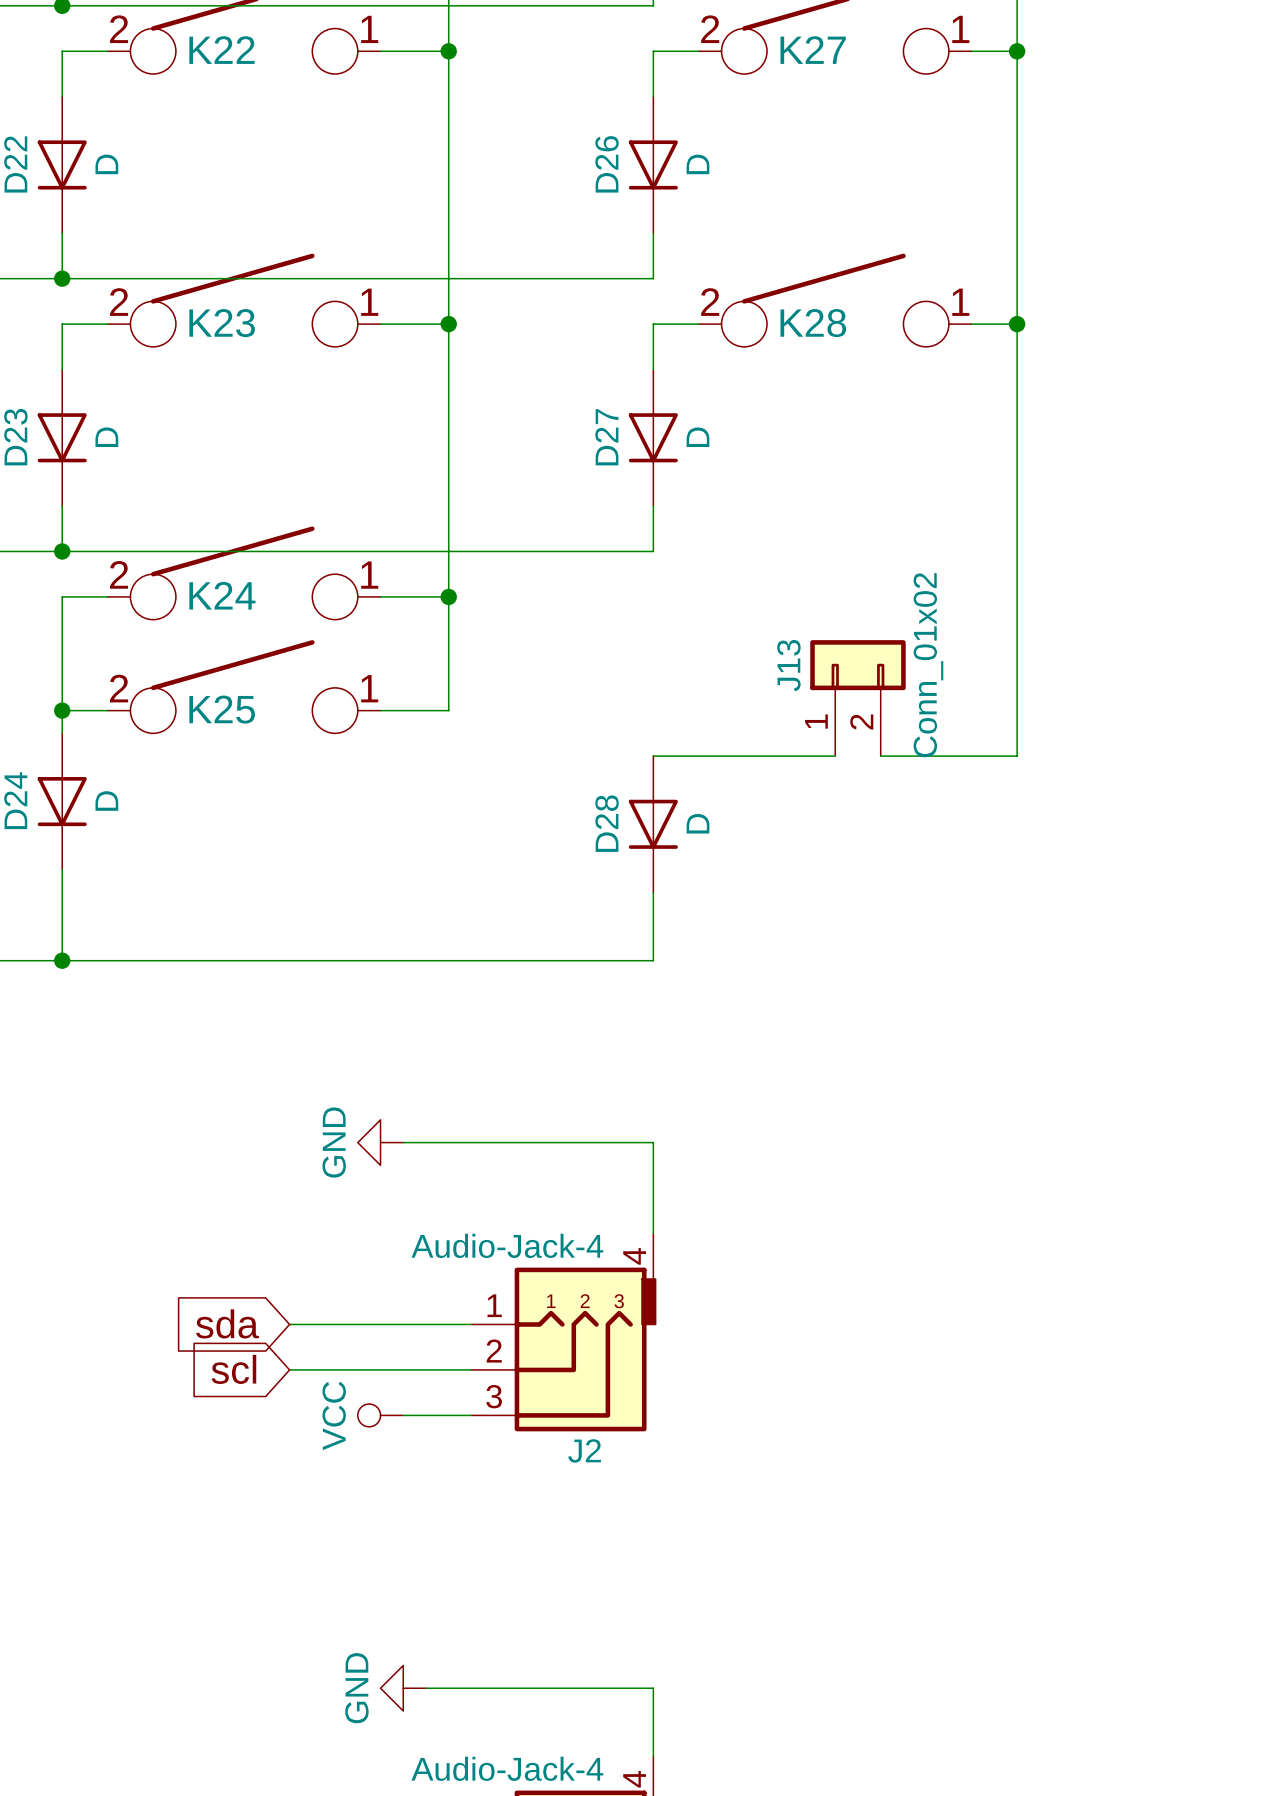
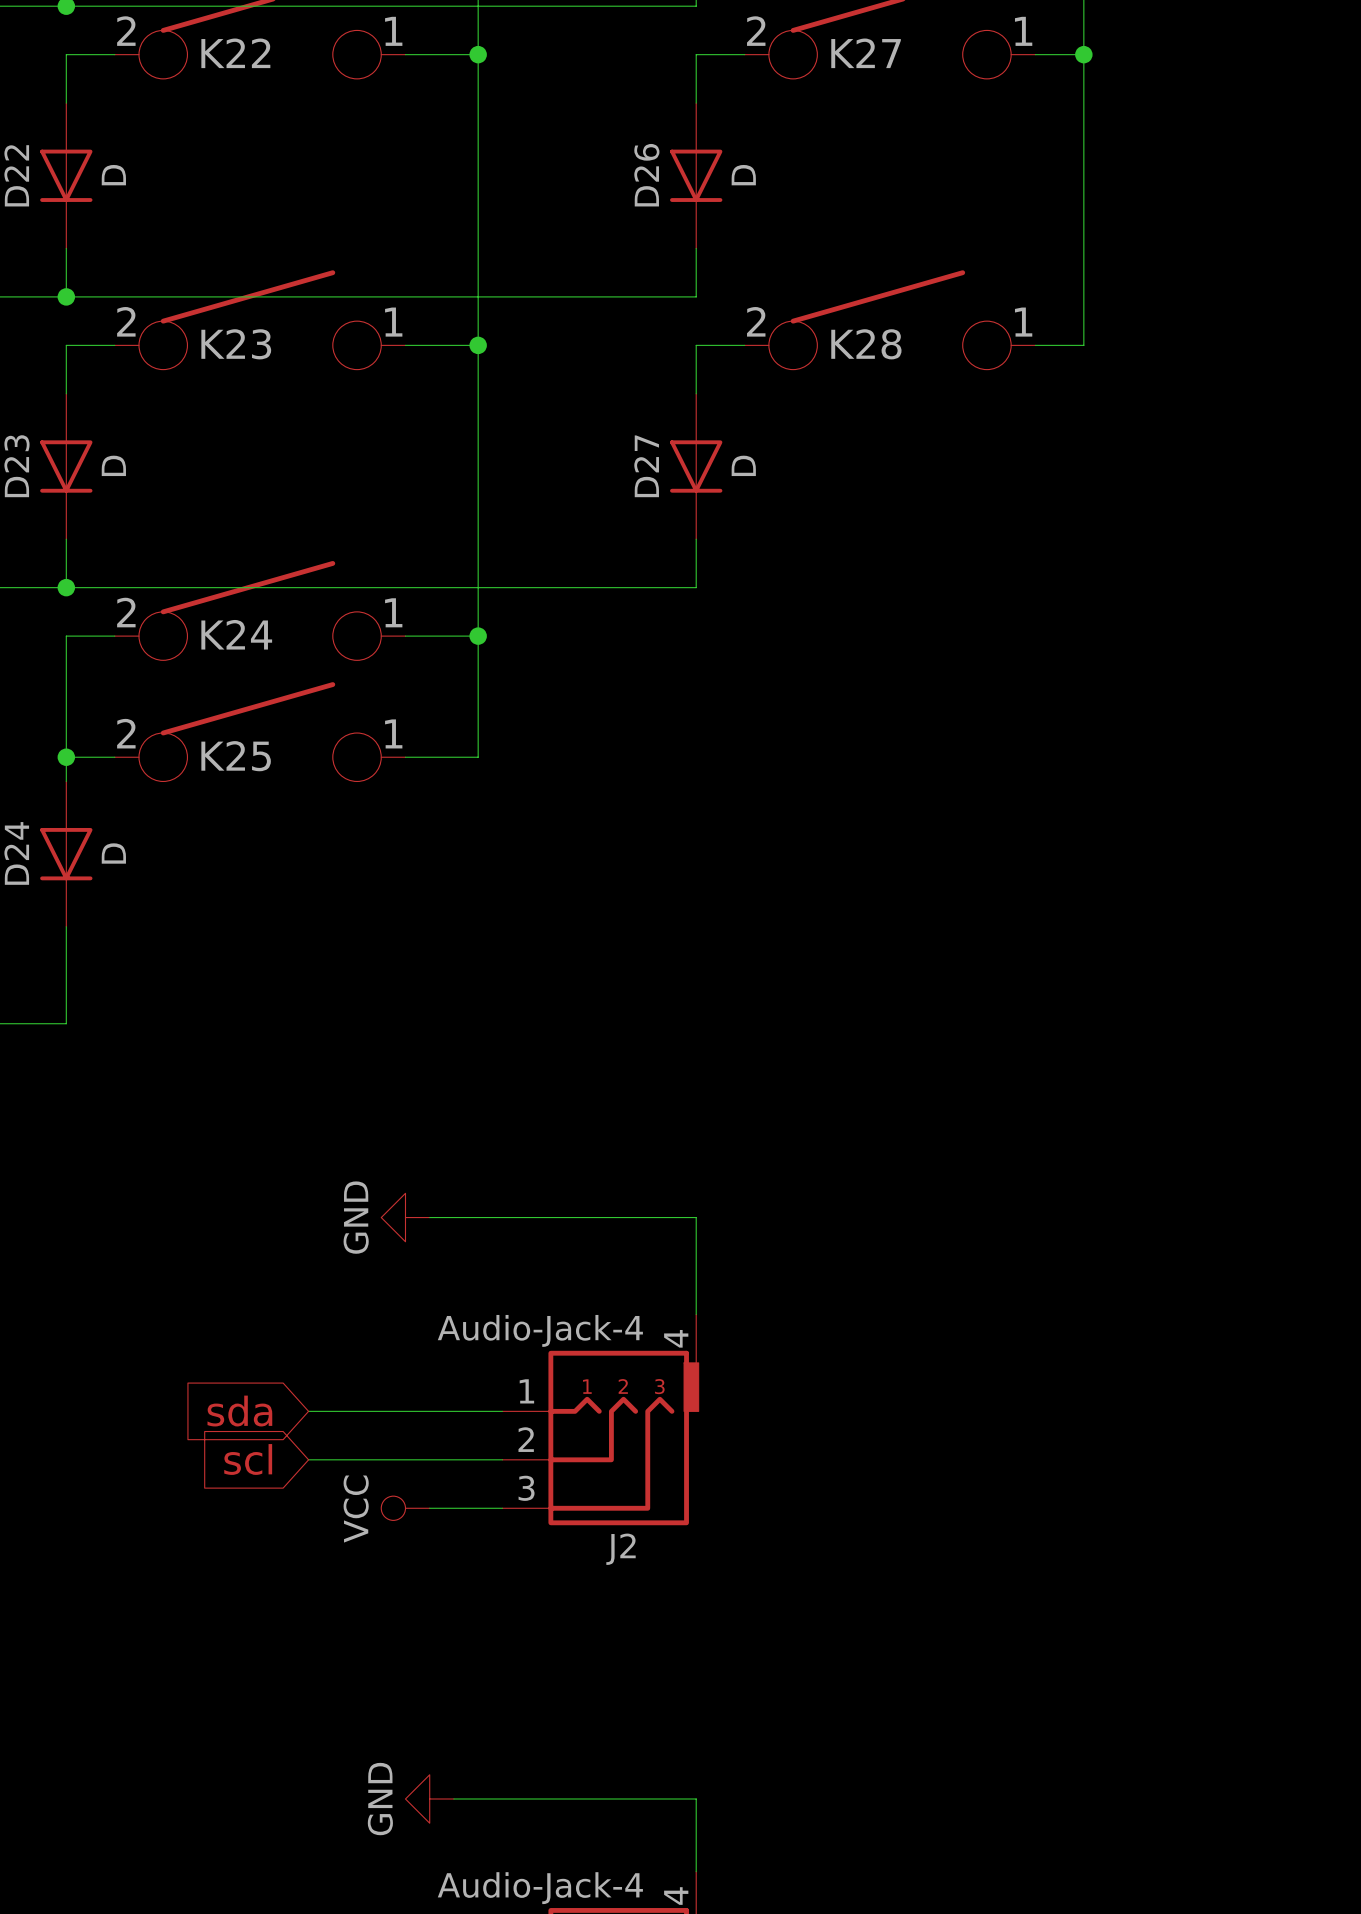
wire: (1017, 324) (1017, 756) (880, 756) -> none
junction: (1017, 324) -> none
J13: Conn_01x02 (857, 698) -> none
wire: (653, 756) (835, 756) -> none
D28: D (653, 824) -> none
wire: (653, 892) (653, 960) (62, 960) -> none
junction: (62, 960) -> none

